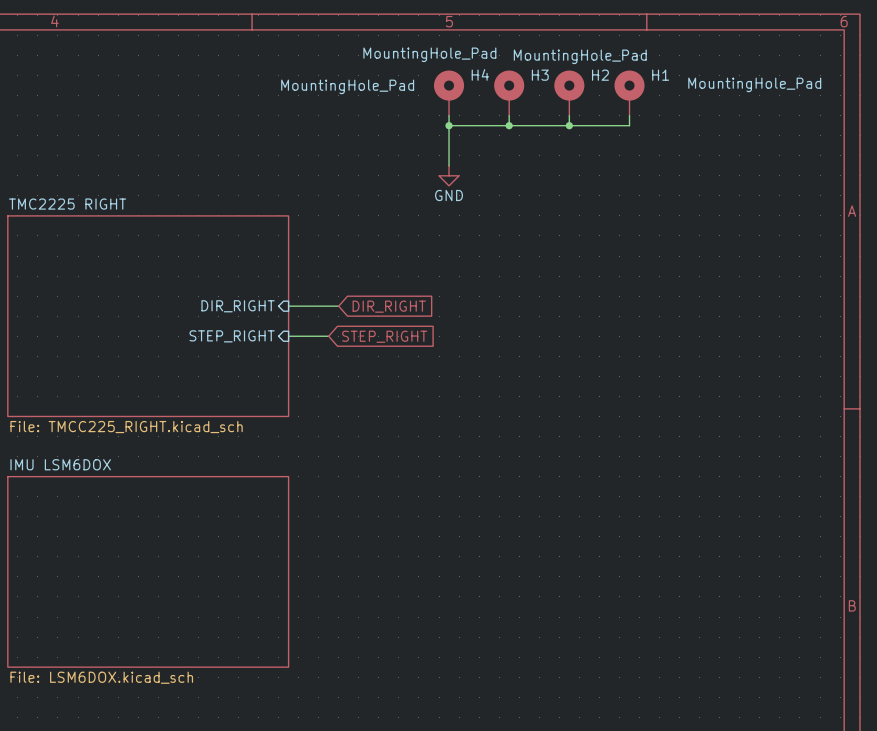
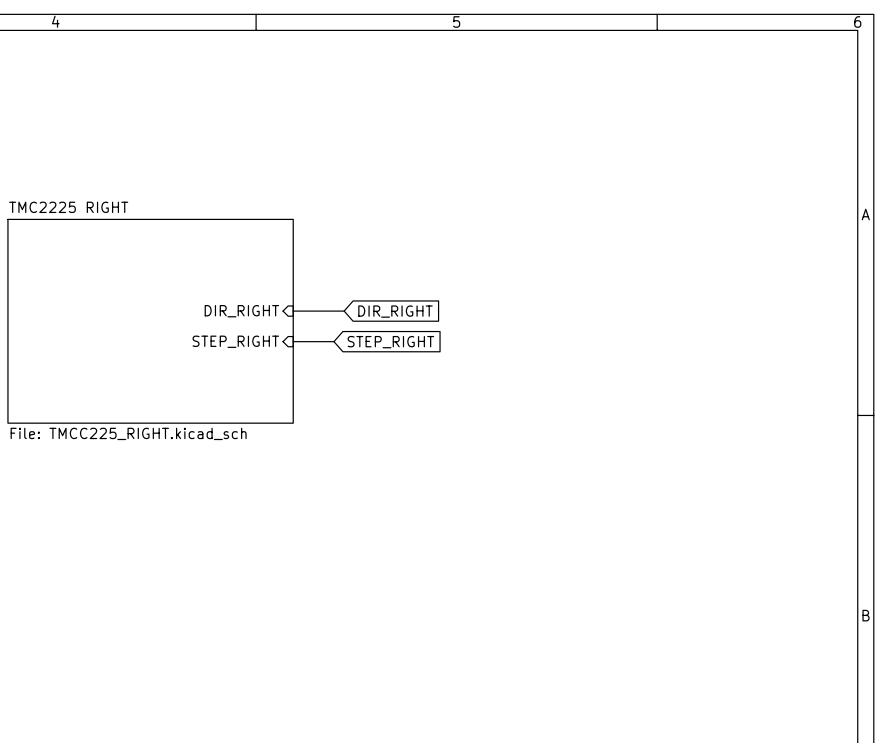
H4: MountingHole_Pad (449, 93) -> none
H3: MountingHole_Pad (509, 93) -> none
H2: MountingHole_Pad (569, 93) -> none
H1: MountingHole_Pad (629, 93) -> none
wire: (449, 115) (449, 165) -> none
wire: (509, 115) (509, 125) -> none
wire: (569, 115) (569, 125) -> none
wire: (629, 115) (629, 125) (449, 125) -> none
junction: (449, 125) -> none
junction: (509, 125) -> none
junction: (569, 125) -> none
power symbol: GND (449, 175) -> none
sheet IMU LSM6DOX: File: LSM6DOX.kicad_sch (148, 571) -> none

